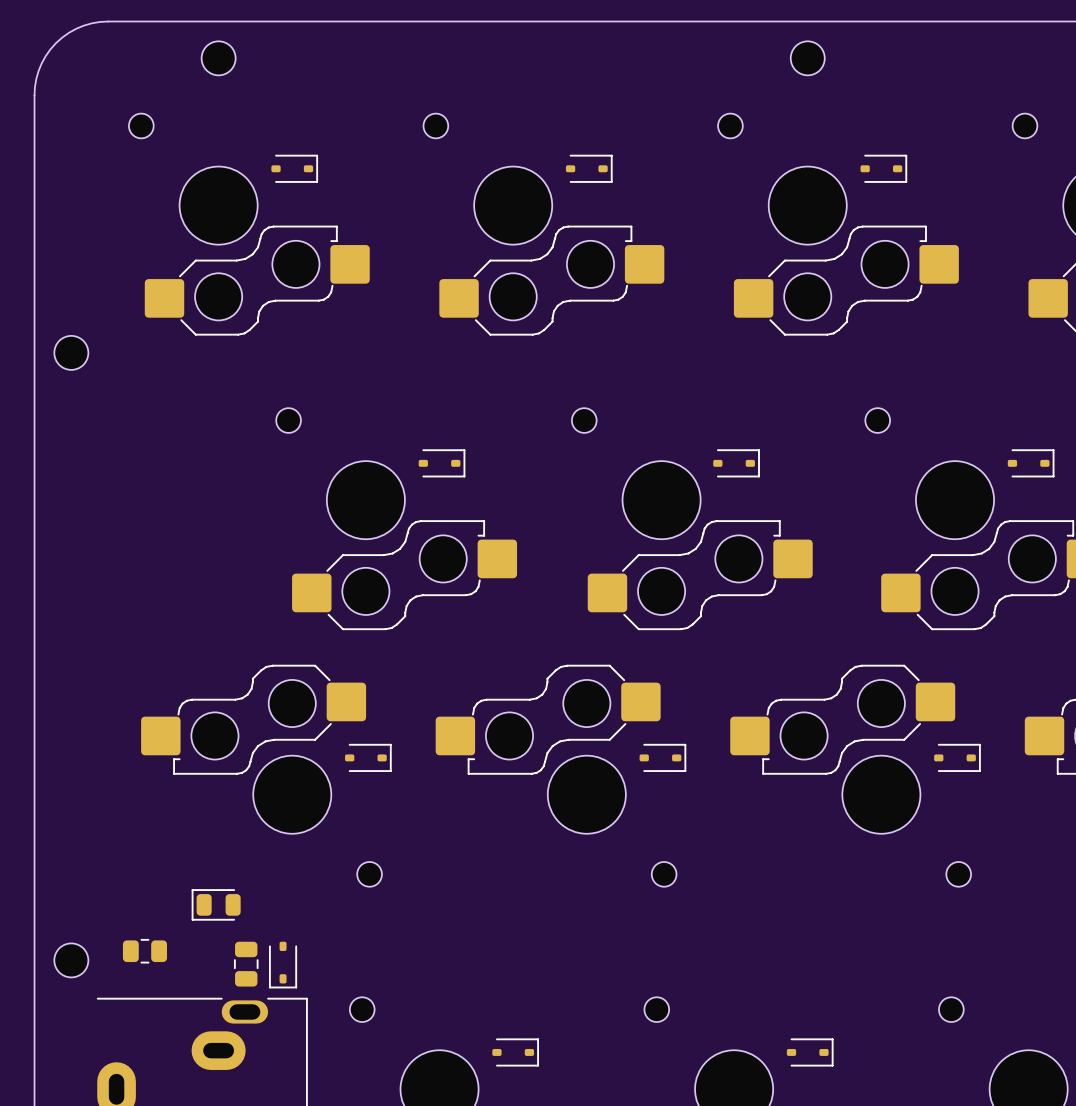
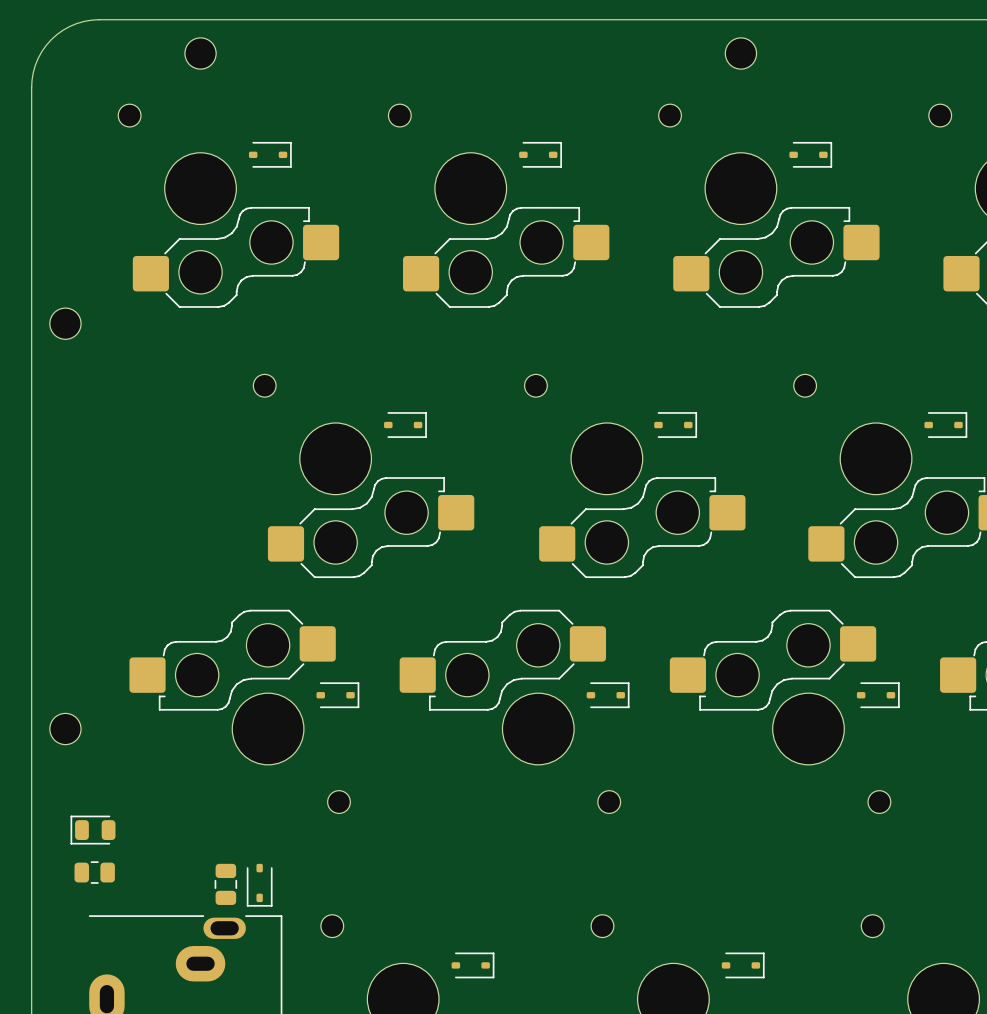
part position: (216, 904) -> (93, 830)
part position: (144, 951) -> (94, 872)
part position: (71, 960) -> (65, 729)

